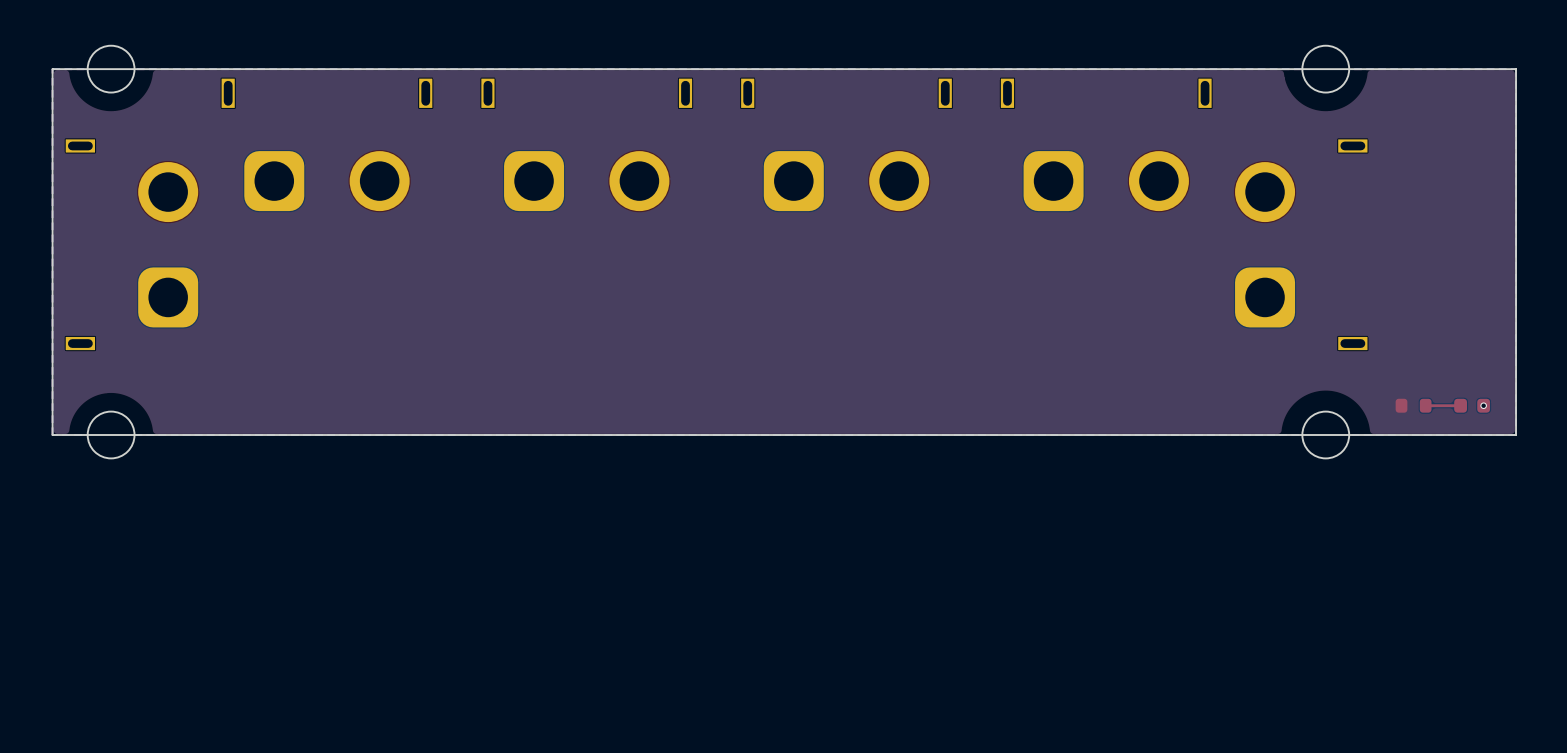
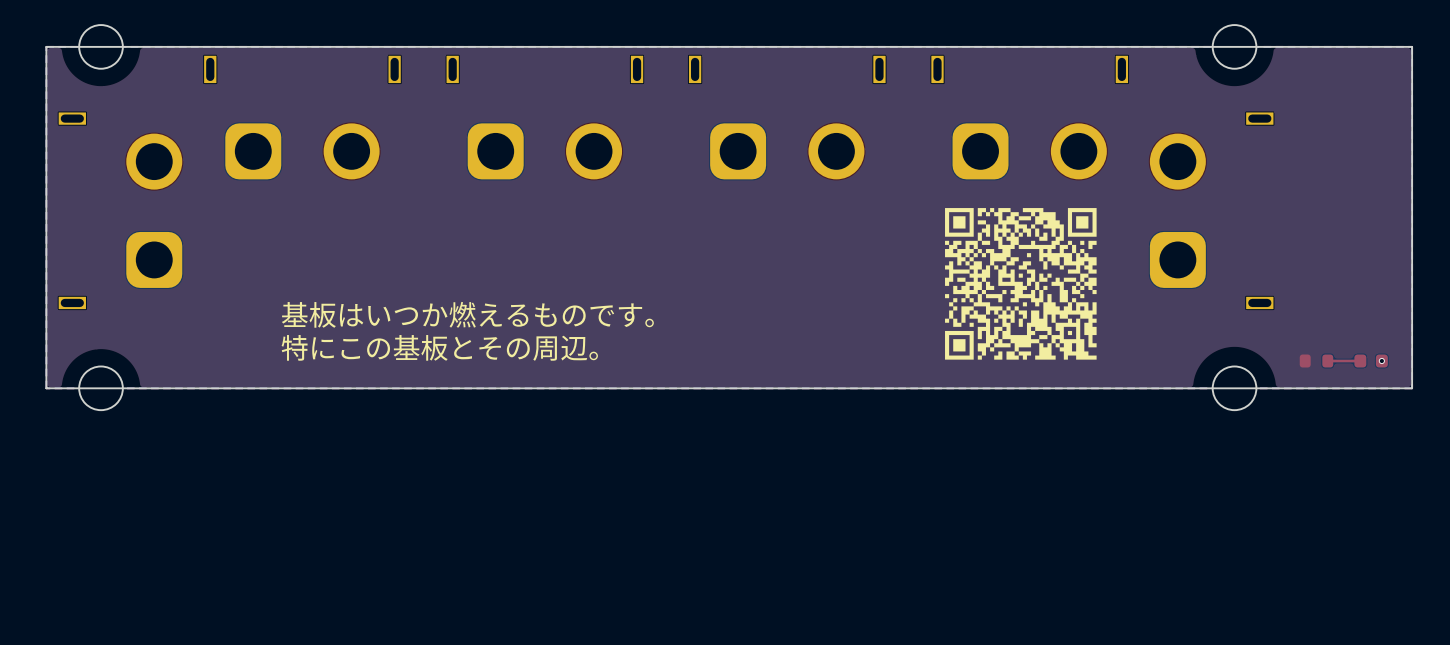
drawing: none -> [945, 208, 1097, 360]
text: none -> 基板はいつか燃えるものです。 (467, 314)
text: none -> 特にこの基板とその周辺。 (439, 347)

